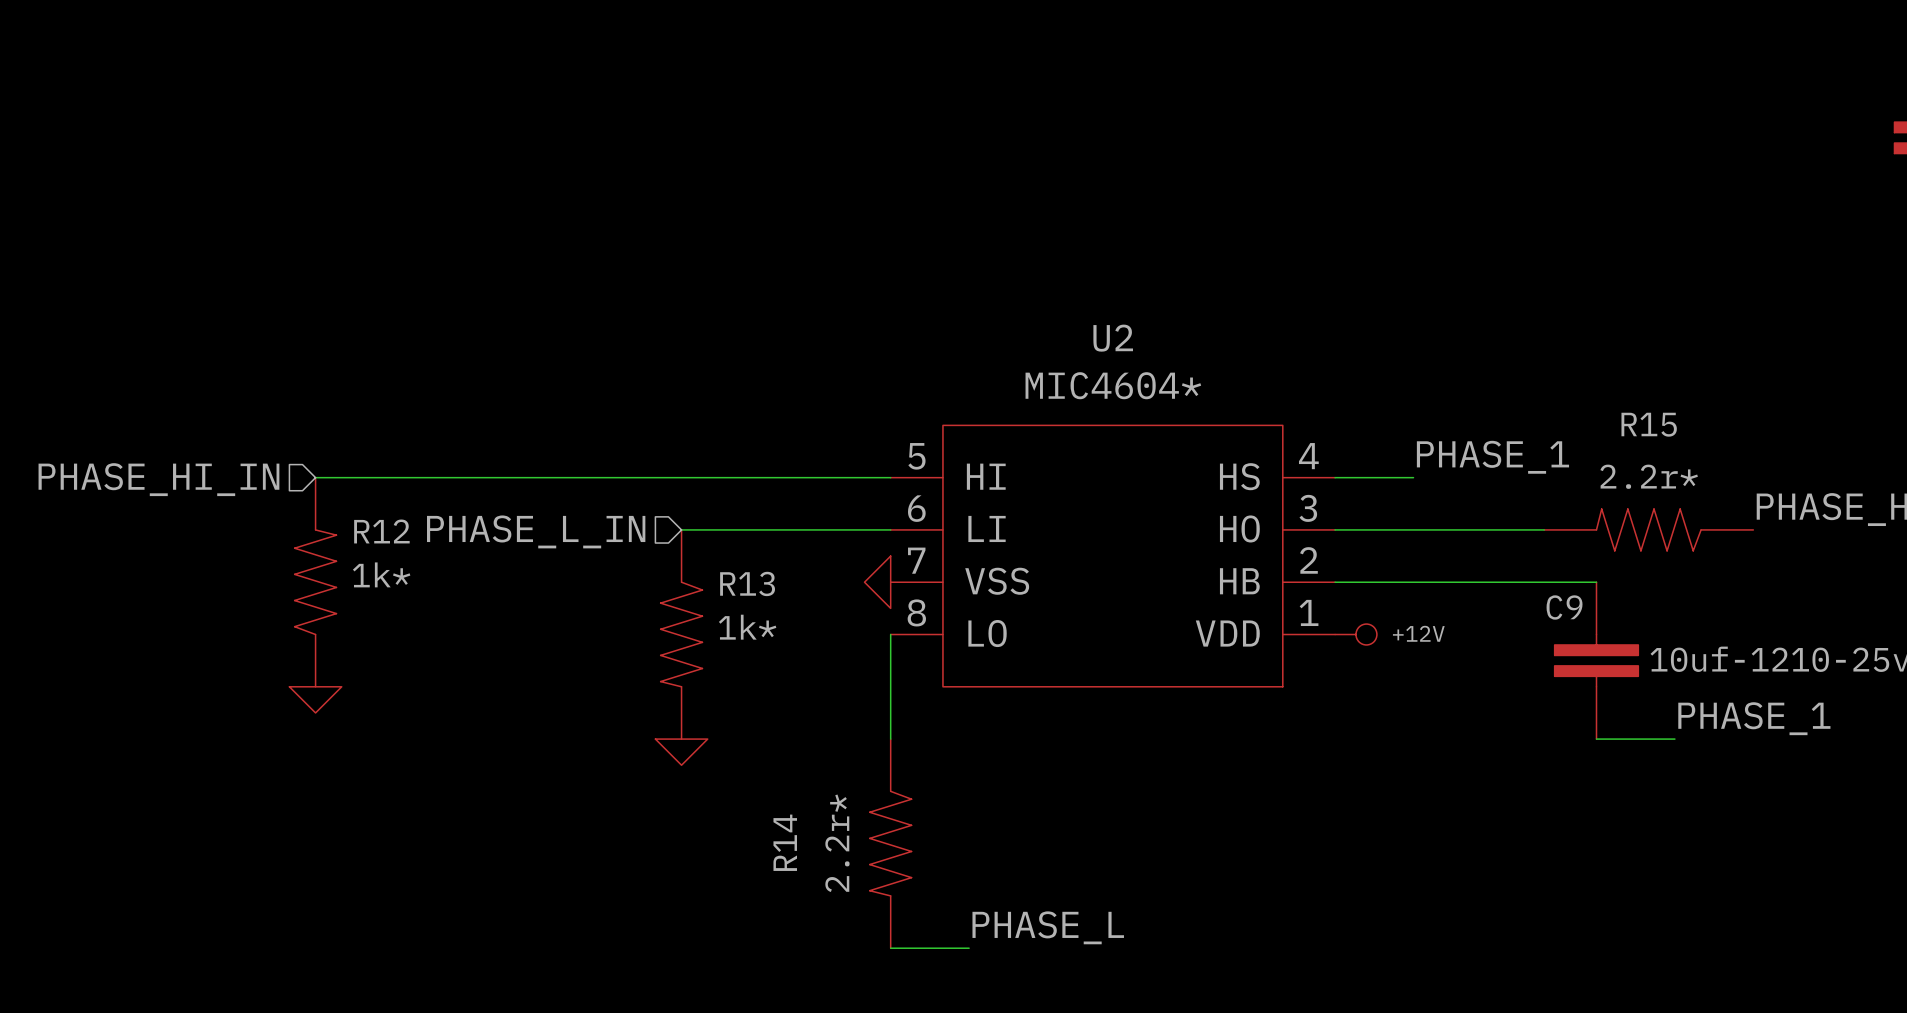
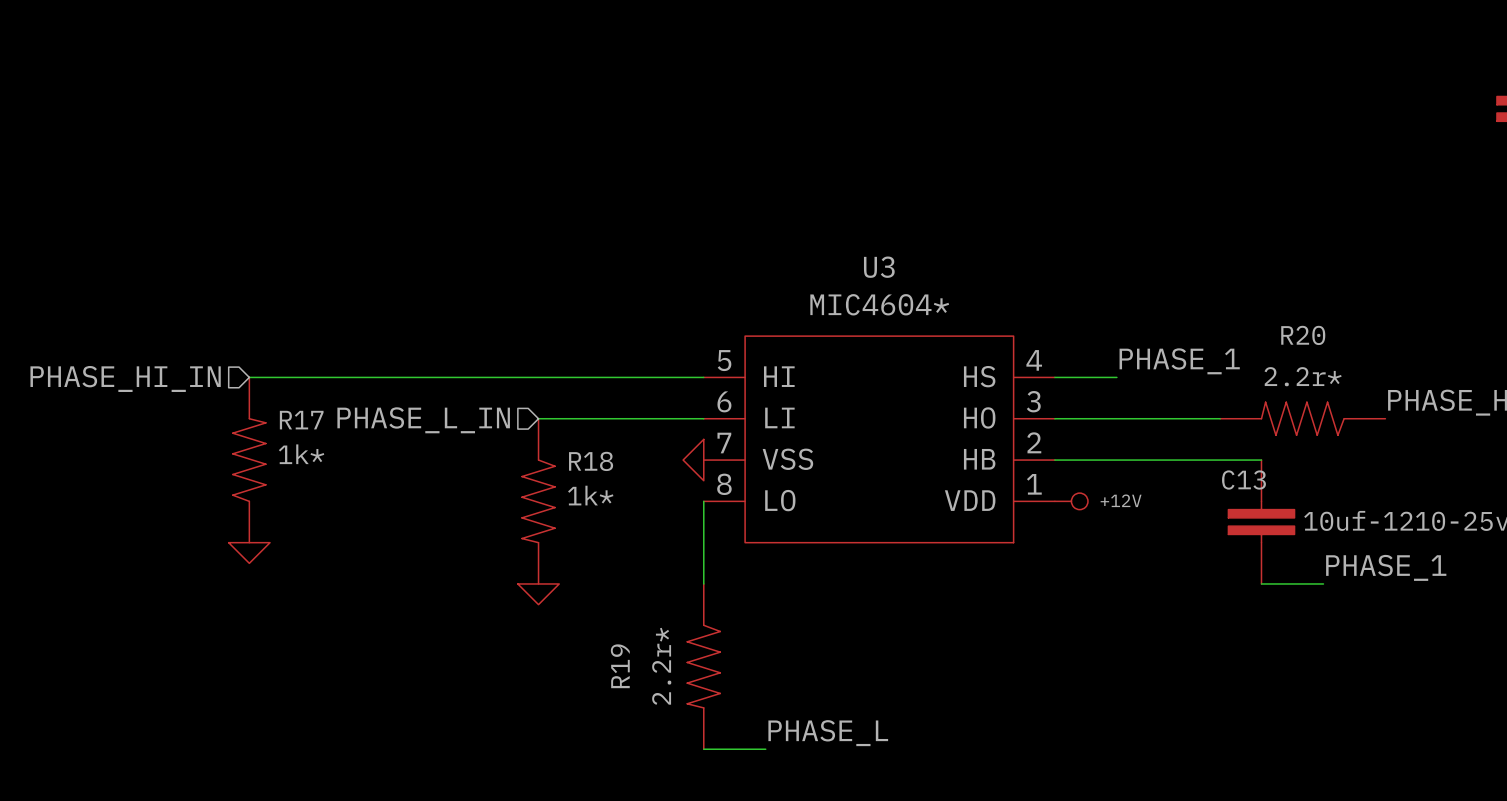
U2 name: U2 (1113, 338) -> U3 (879, 267)
R15 name: R15 (1649, 424) -> R20 (1303, 335)
R12 name: R12 (381, 531) -> R17 (301, 420)
R13 name: R13 (747, 583) -> R18 (591, 461)
C9 name: C9 (1564, 607) -> C13 (1243, 480)
R14 name: R14 (785, 842) -> R19 (620, 666)

